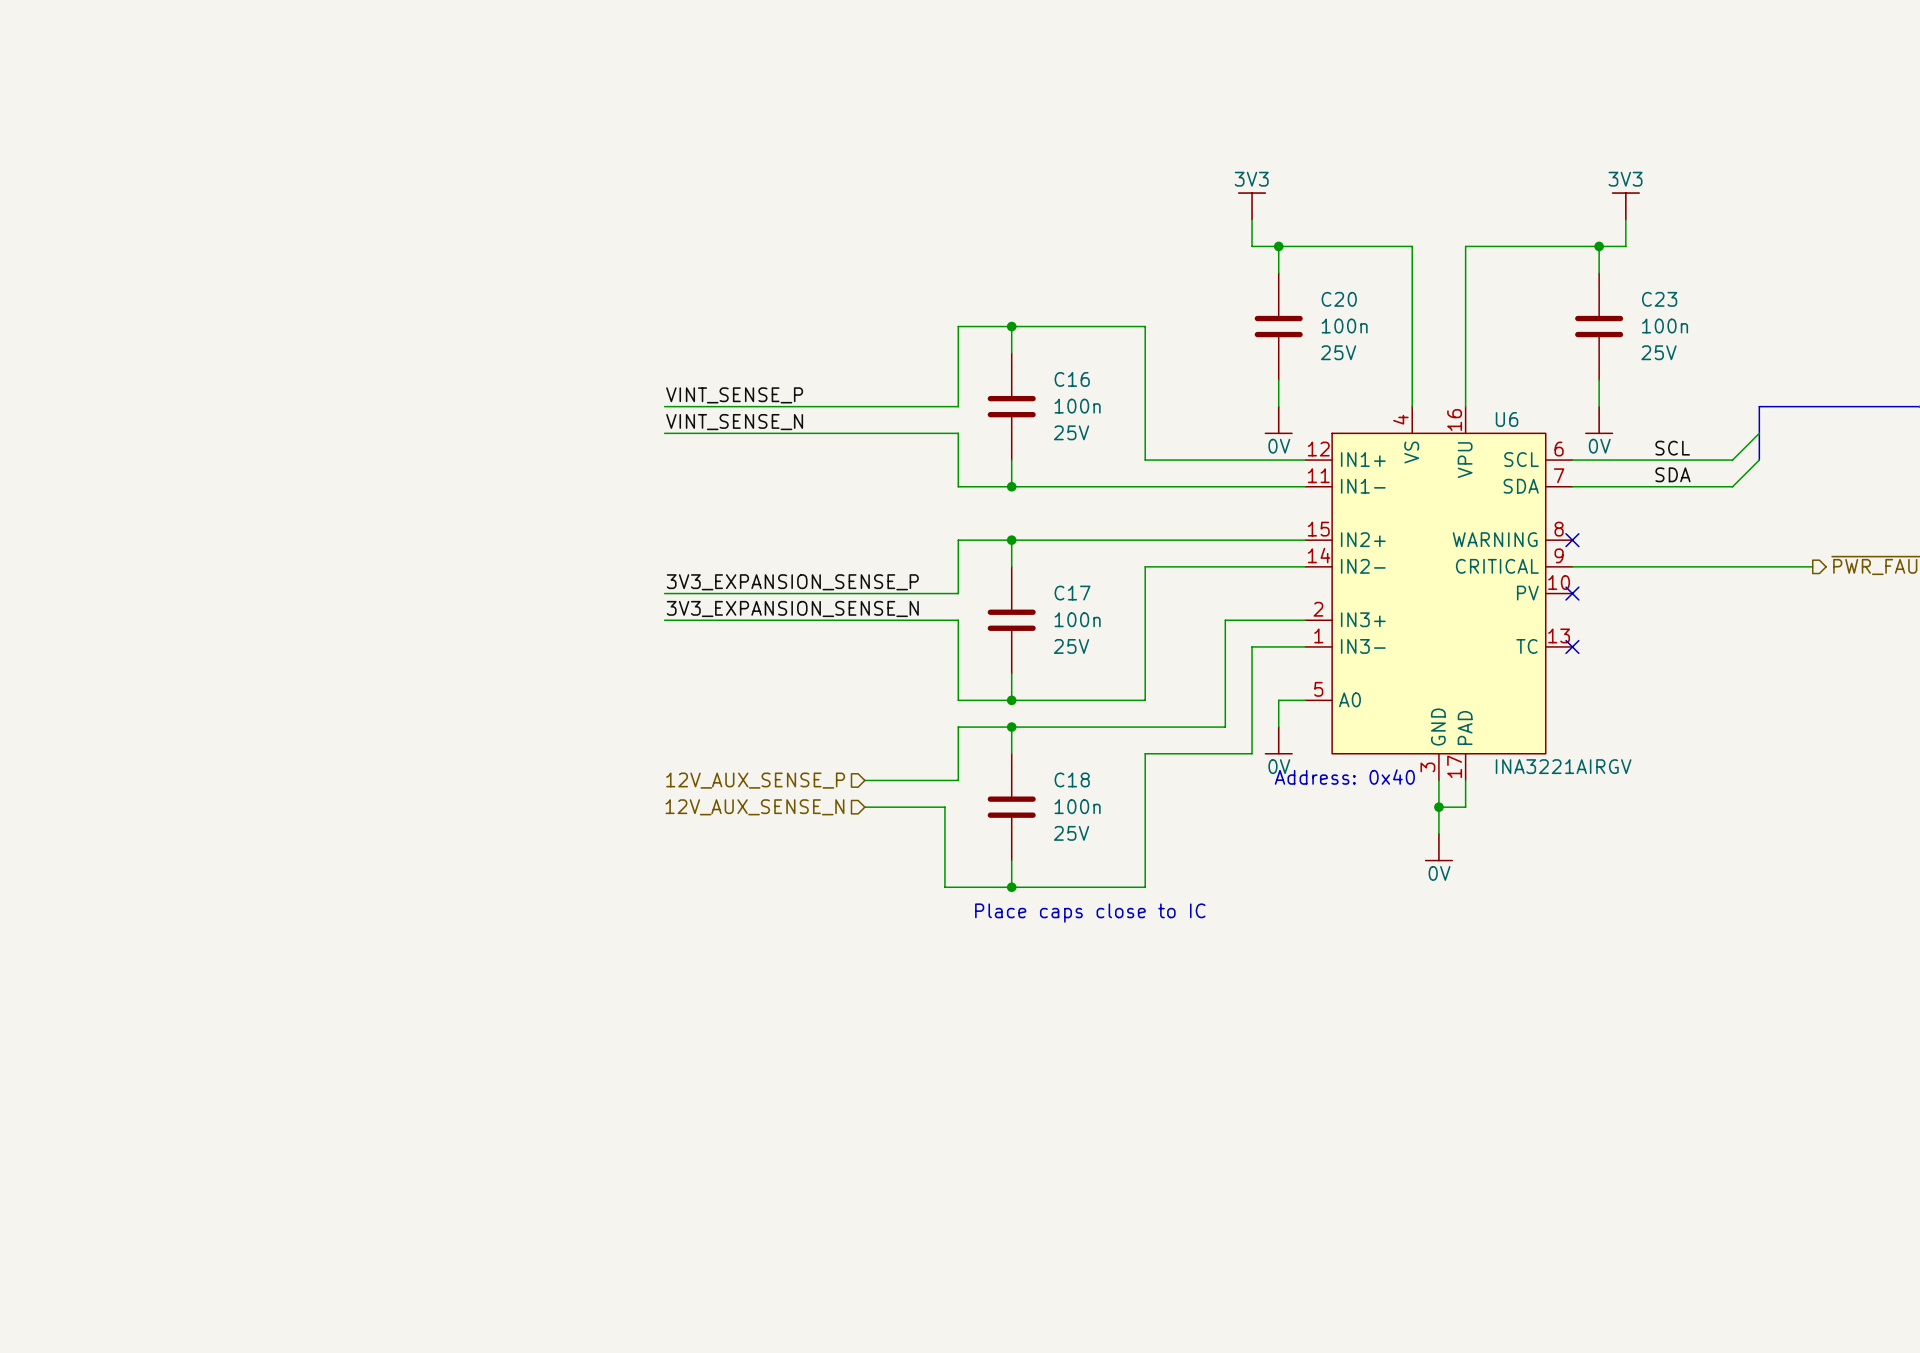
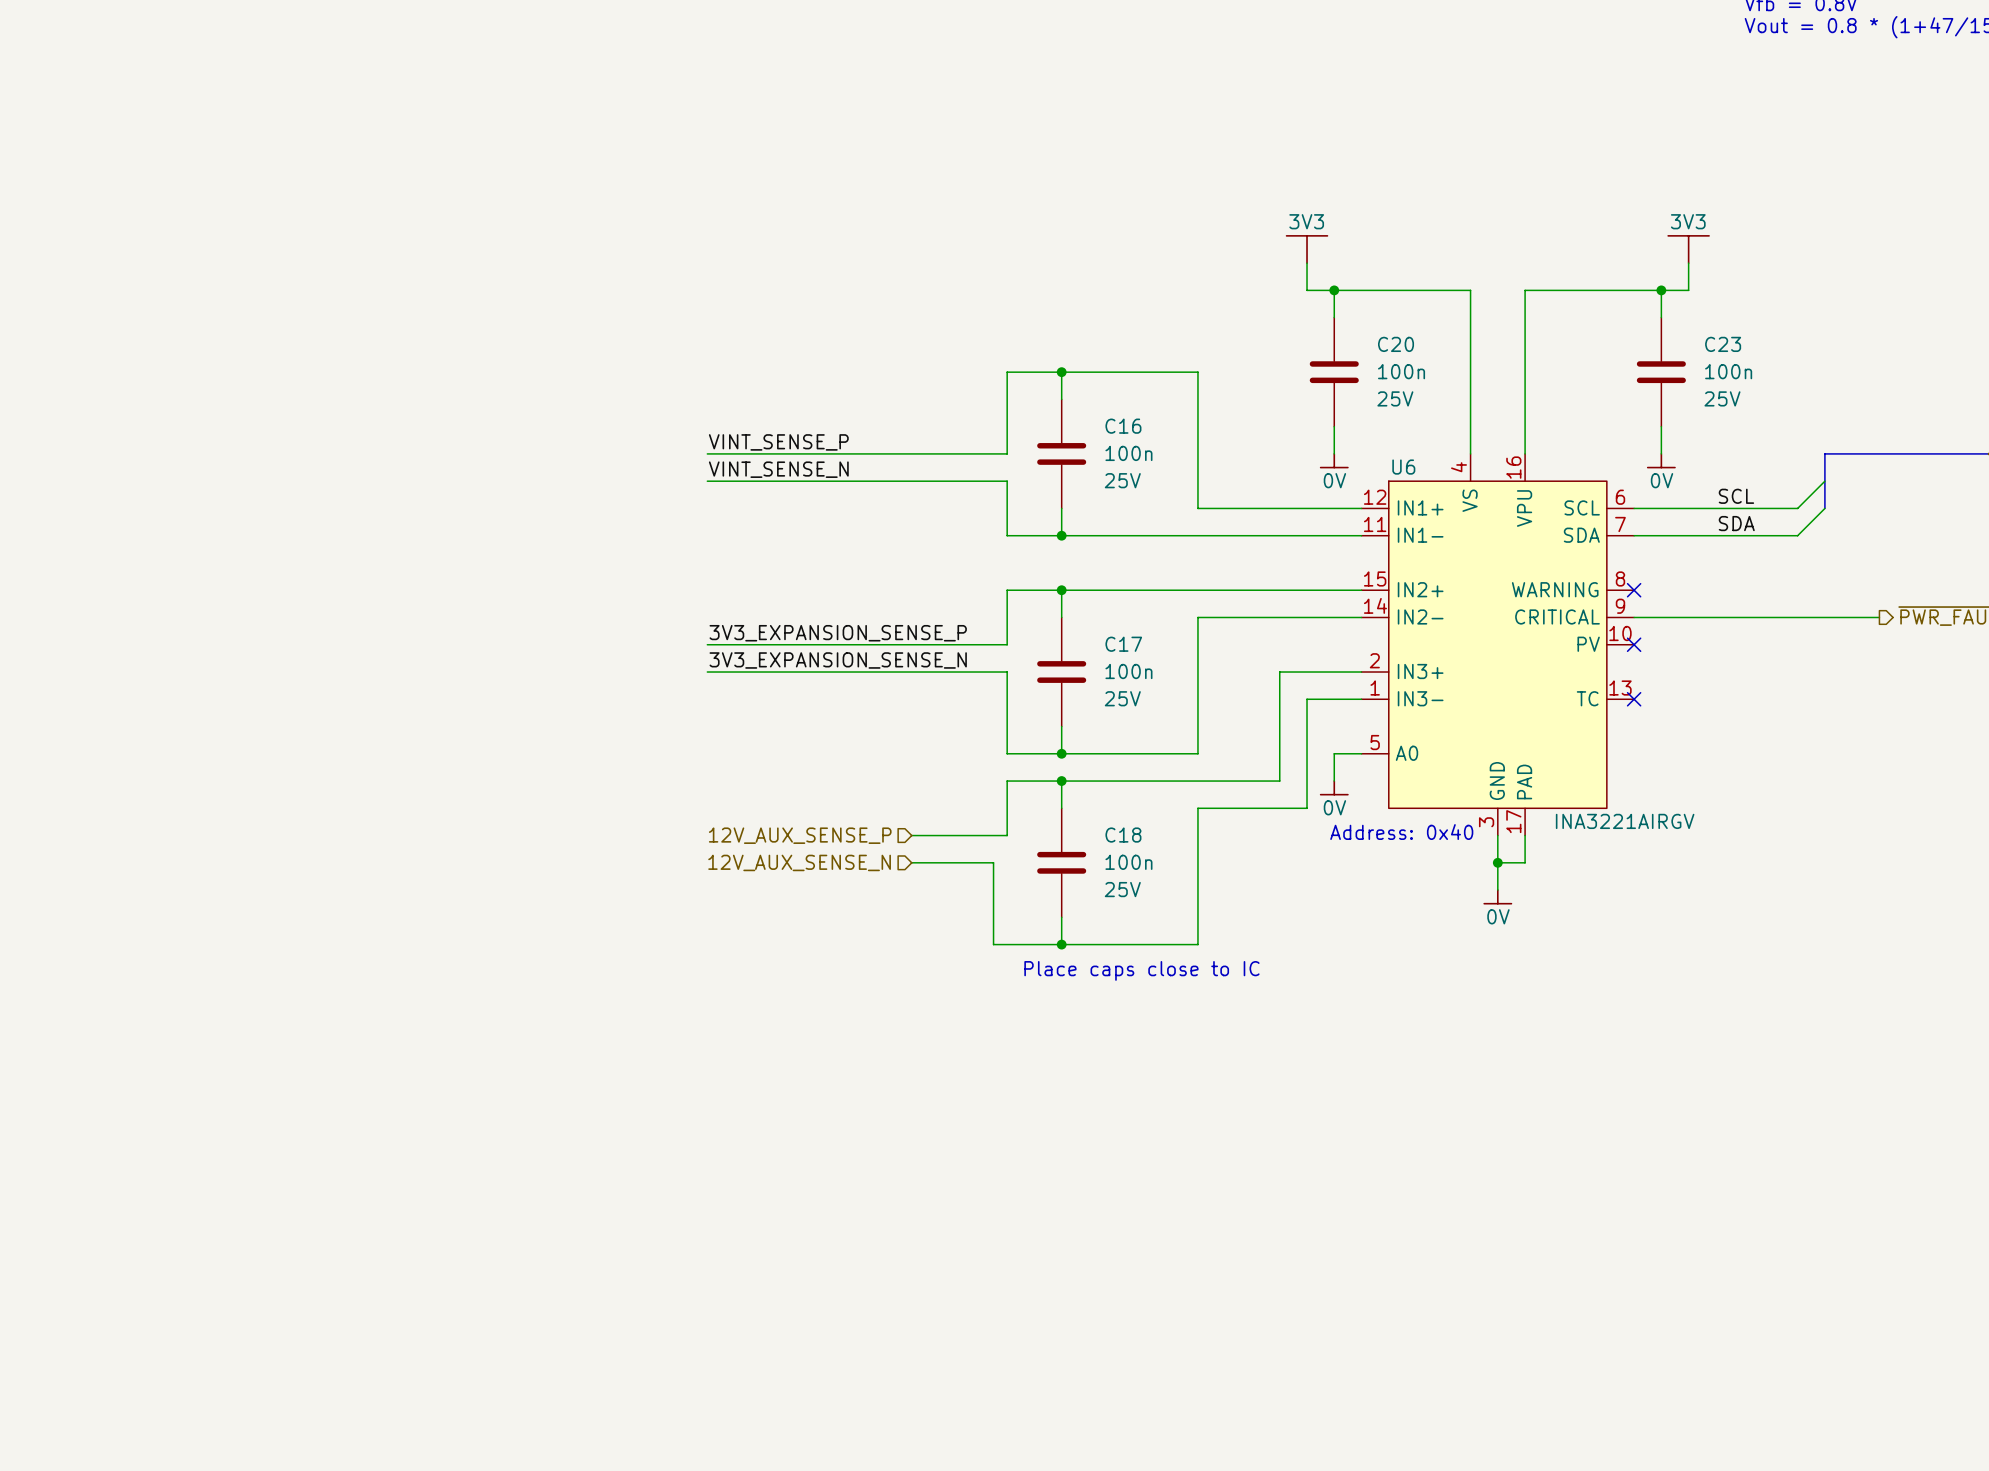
power symbol shape: [1237, 192, 1267, 221] -> [1285, 235, 1329, 264]
power symbol shape: [1611, 192, 1640, 221] -> [1667, 235, 1710, 264]
power symbol shape: [1265, 405, 1293, 435] -> [1319, 453, 1349, 469]
power symbol shape: [1585, 405, 1613, 435] -> [1646, 453, 1676, 469]
U6 name position: U6 (1507, 419) -> U6 (1403, 467)
power symbol shape: [1265, 726, 1293, 755] -> [1319, 780, 1349, 796]
power symbol shape: [1425, 833, 1453, 862] -> [1483, 889, 1513, 905]

